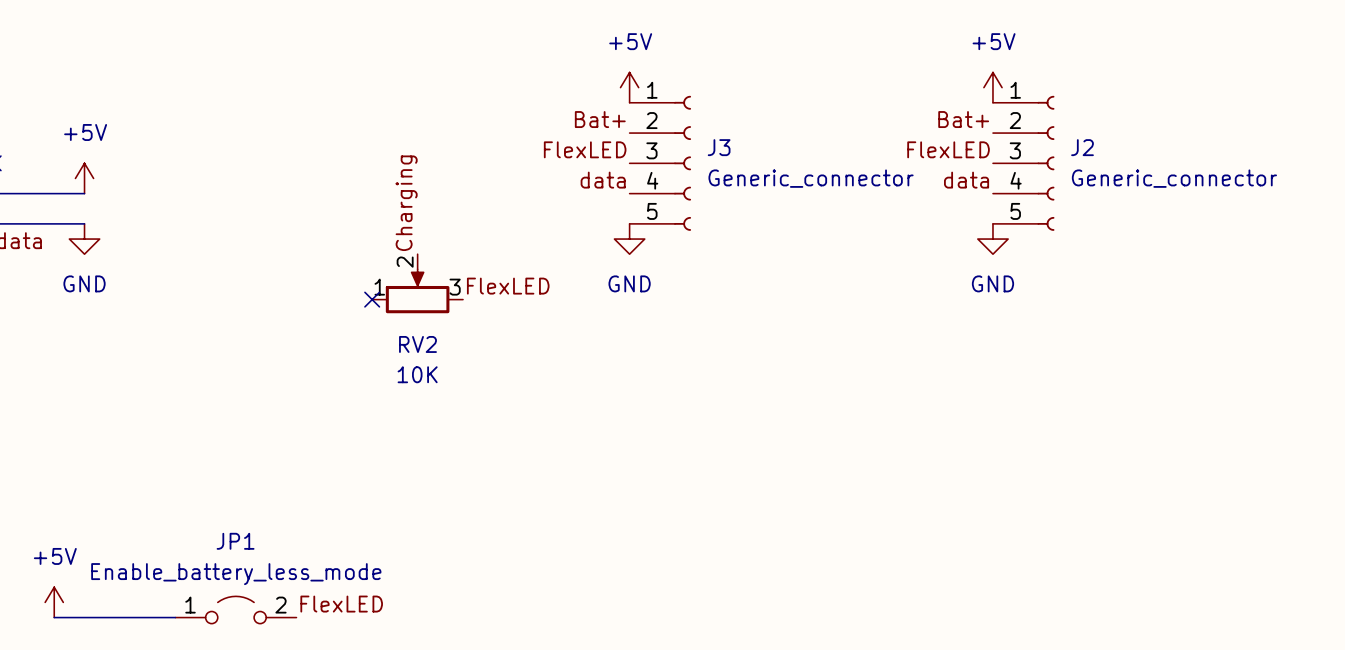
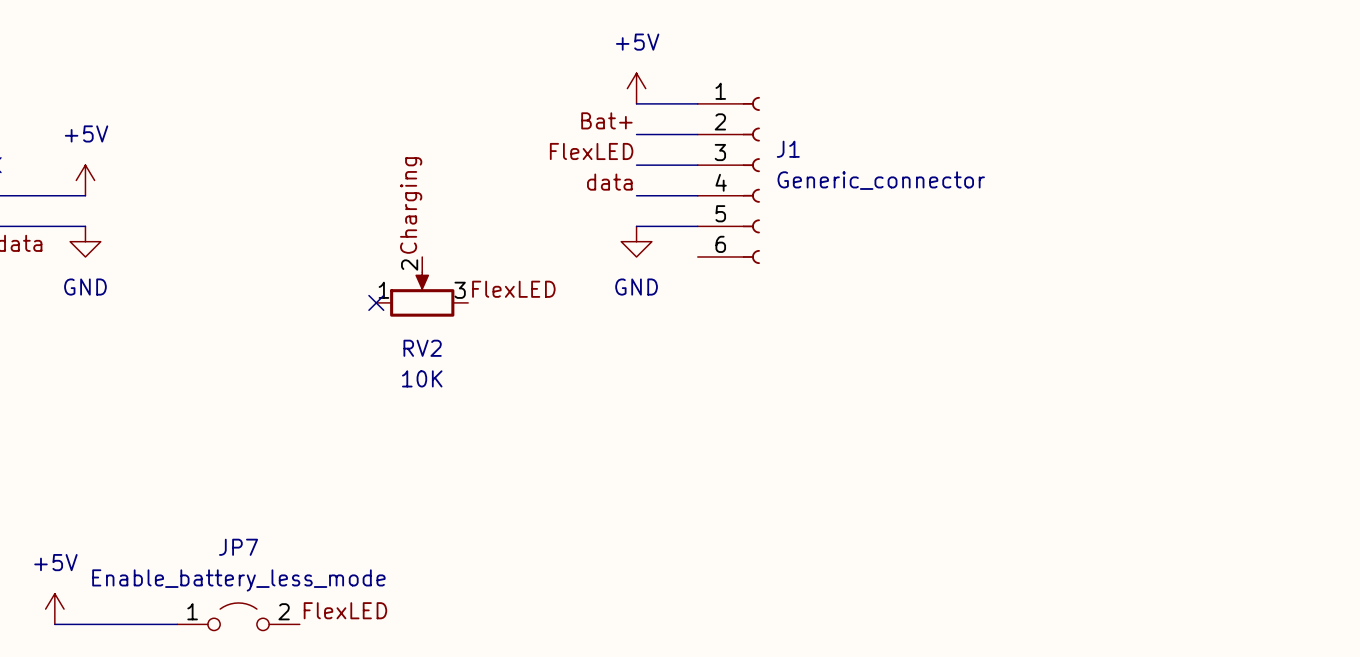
power symbol: +5V (992, 87) -> none
label: Bat+ (963, 119) -> none
label: FlexLED (948, 149) -> none
J3: Generic_connector (660, 163) -> none
J2: Generic_connector (1023, 163) -> none
J1: none -> Generic_connector (728, 180)
label: data (966, 180) -> none
power symbol: GND (992, 239) -> none
JP1 name: JP1 (235, 541) -> JP7 (238, 547)

